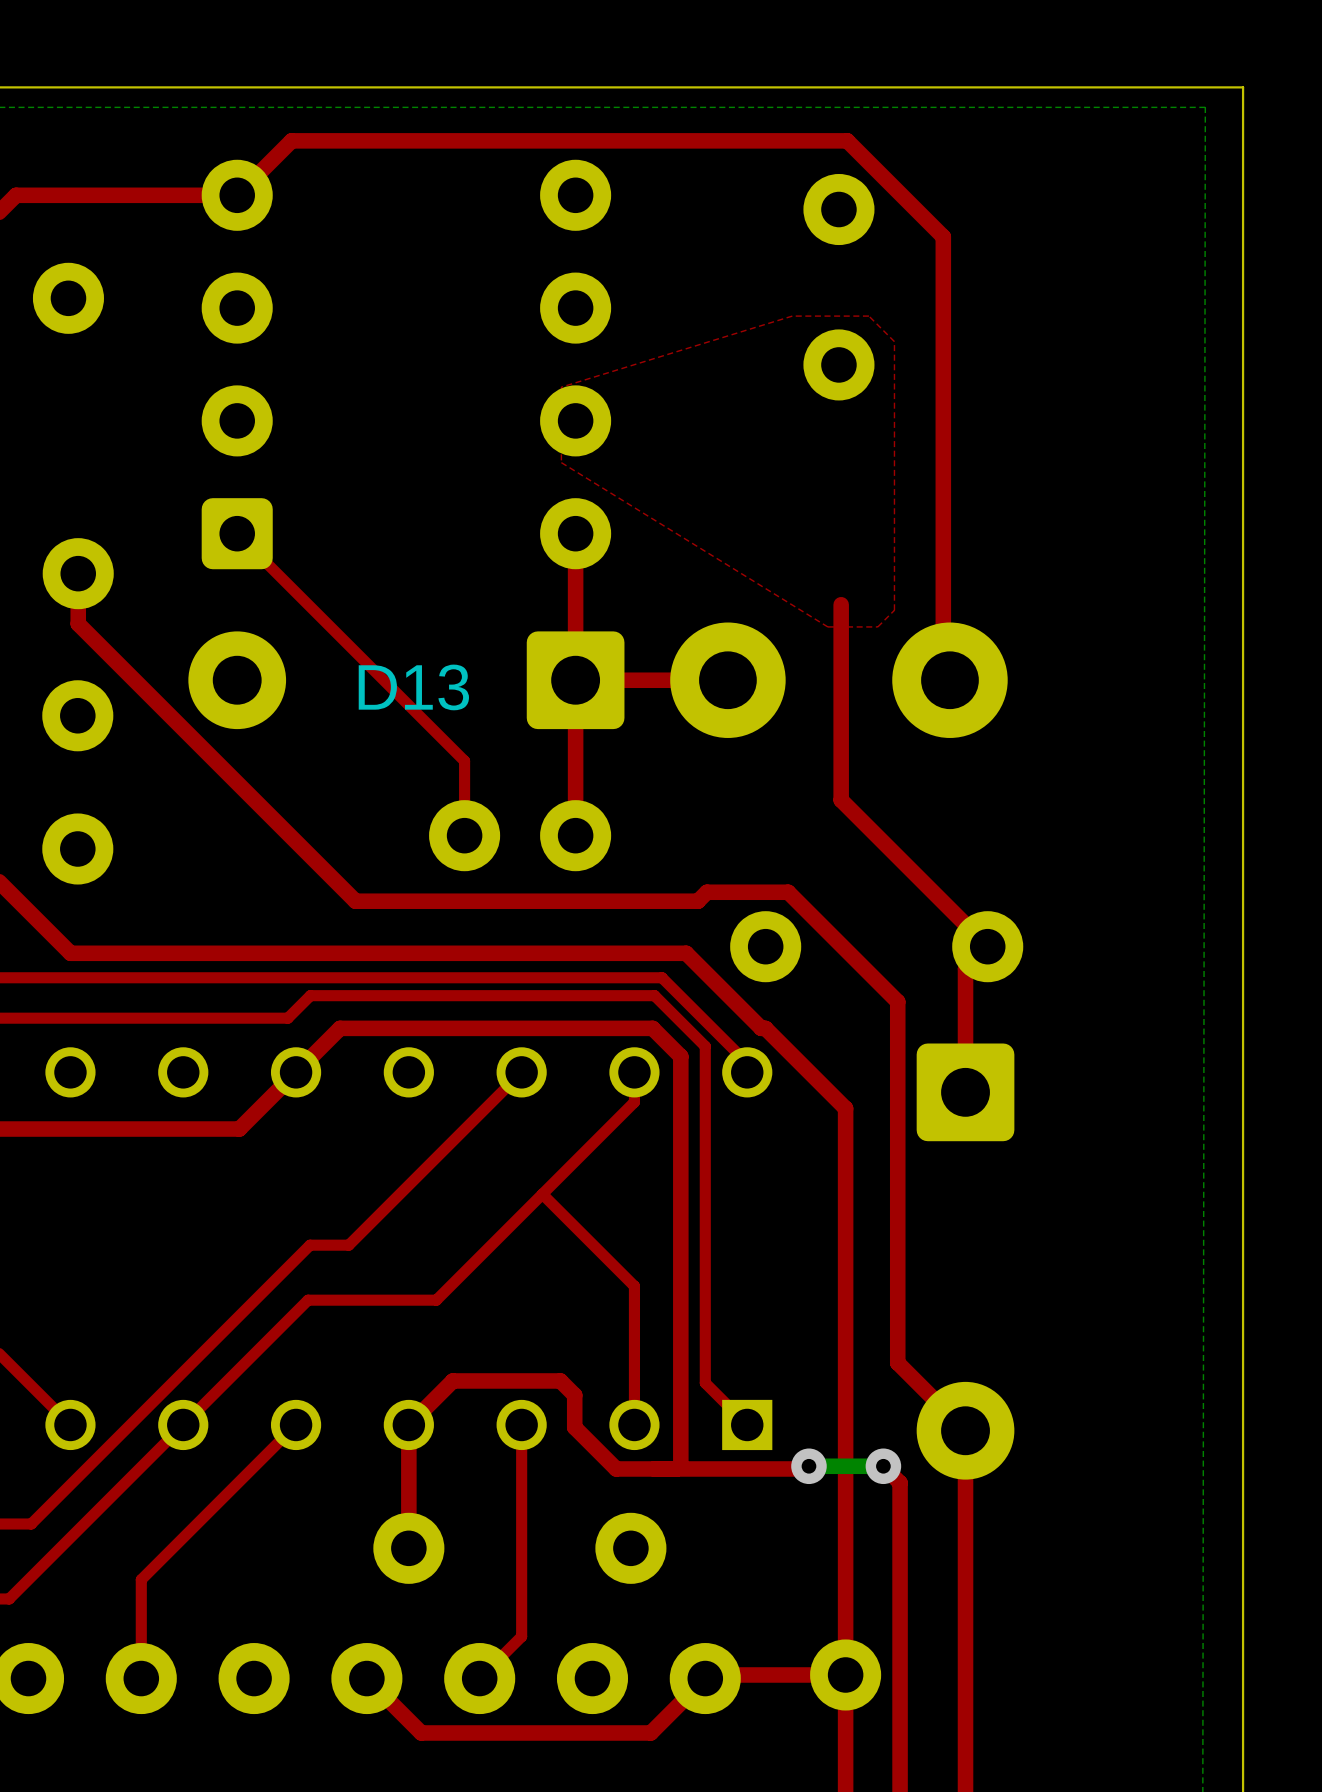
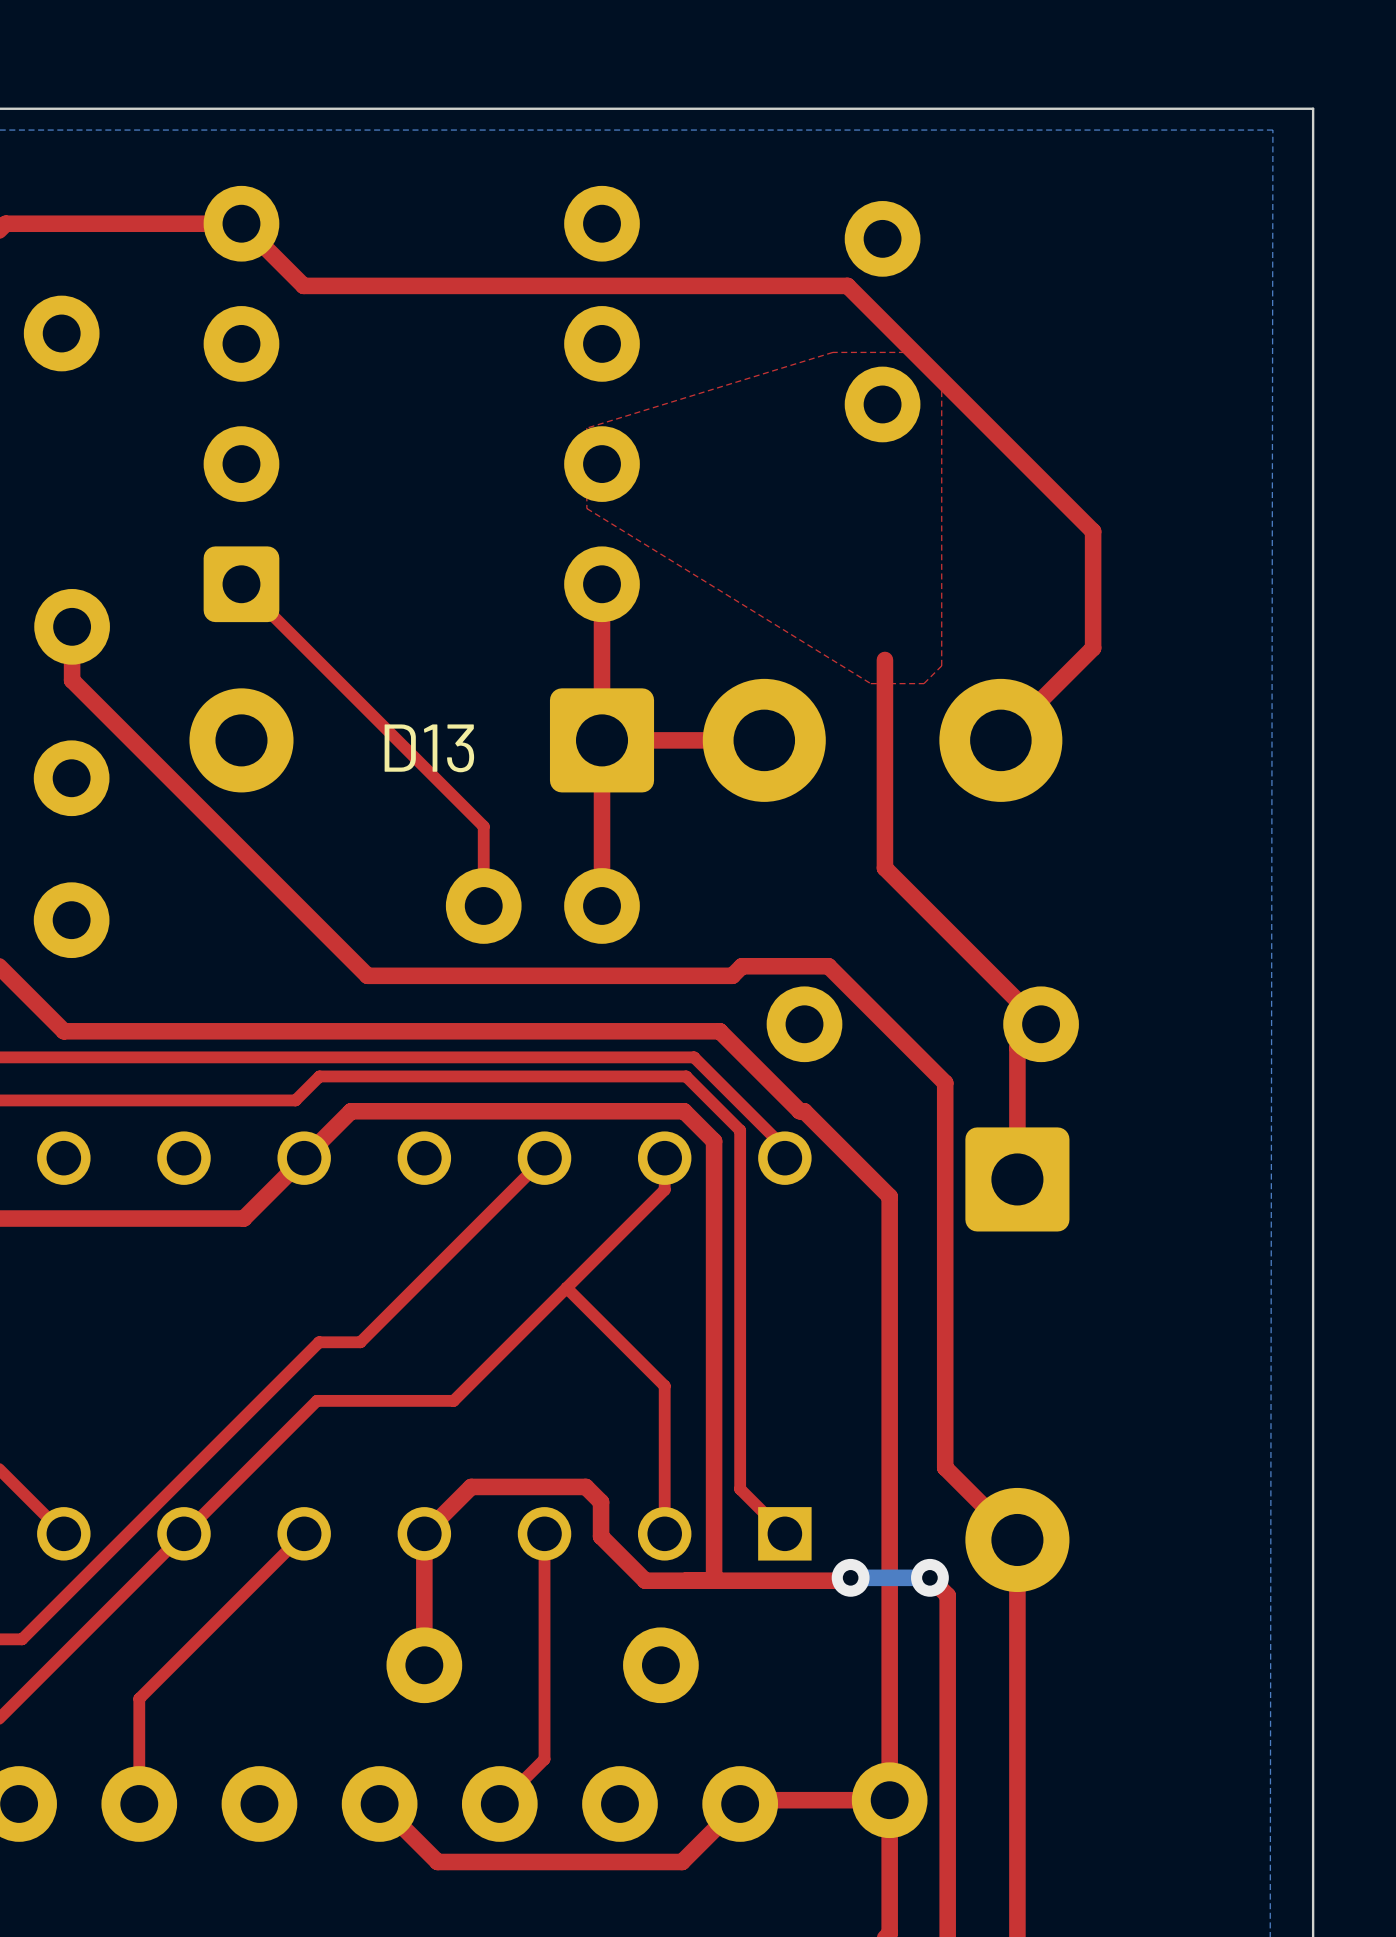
top track: (237, 195) (291, 140) (847, 140) (943, 236) (943, 673) (949, 680) -> (241, 223) (303, 285) (847, 285) (1093, 531) (1093, 648) (1000, 740)

